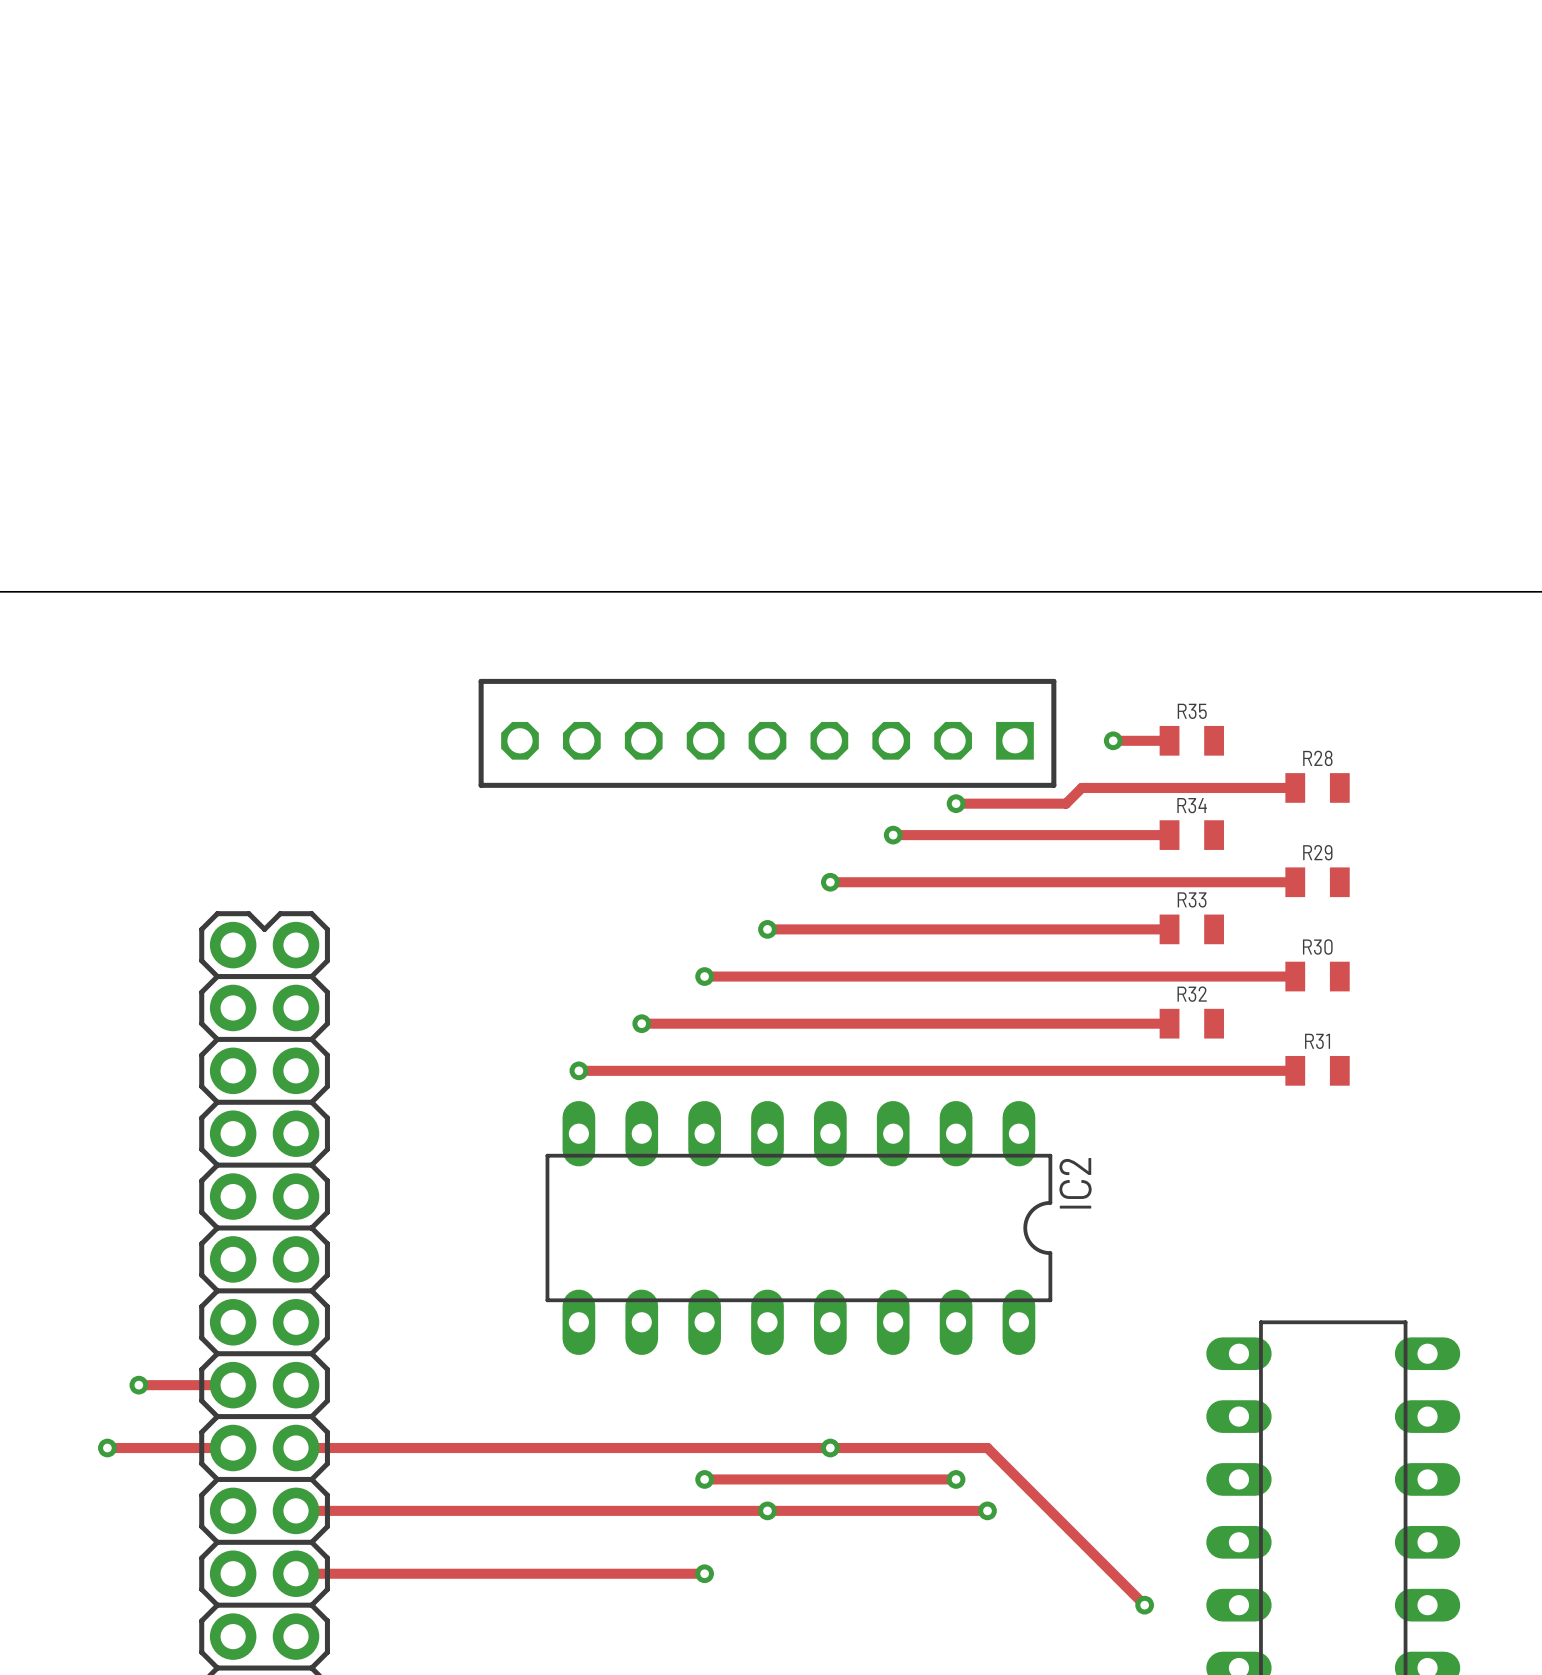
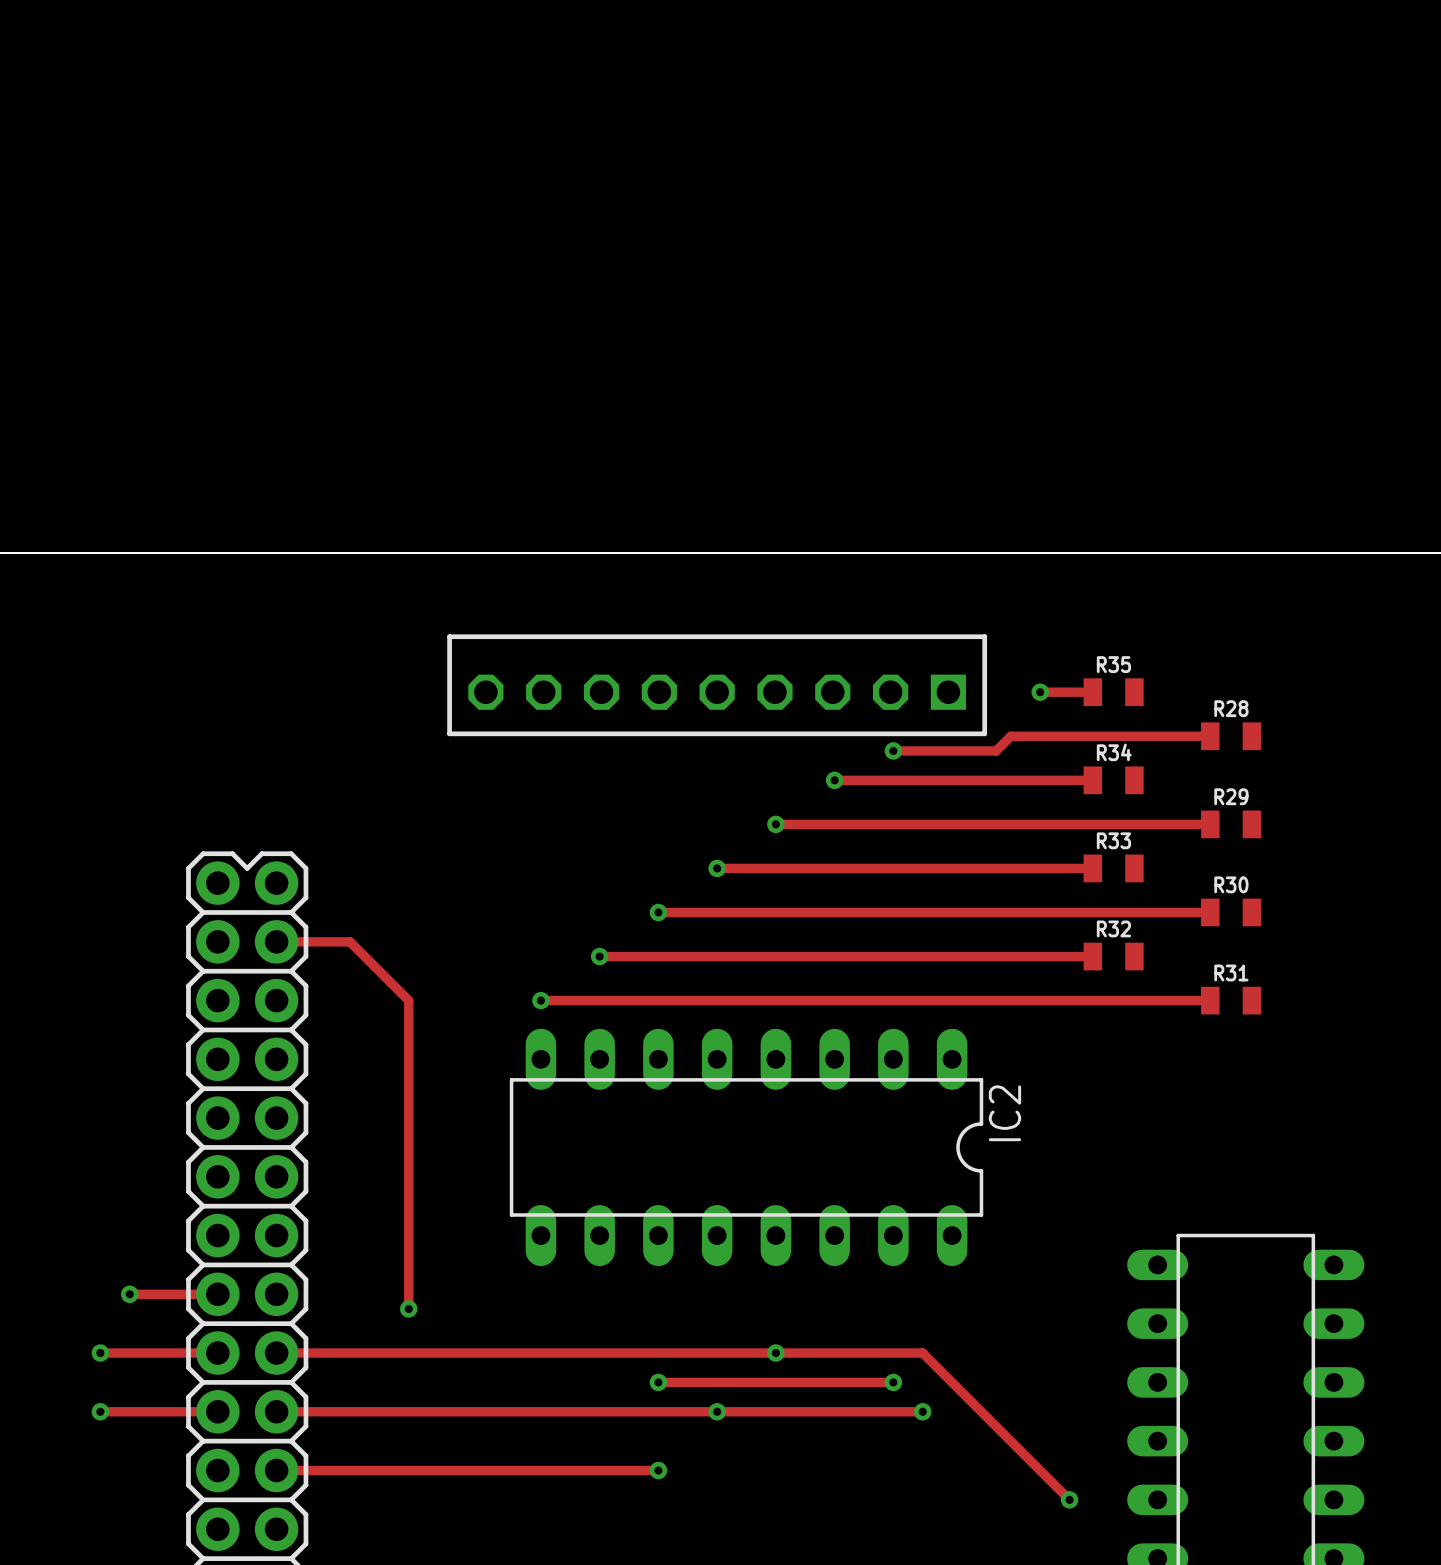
track: none -> (276, 941) (350, 941) (408, 1000) (408, 1308)
via: none -> (408, 1308)
track: none -> (100, 1411) (217, 1411)
via: none -> (100, 1411)

